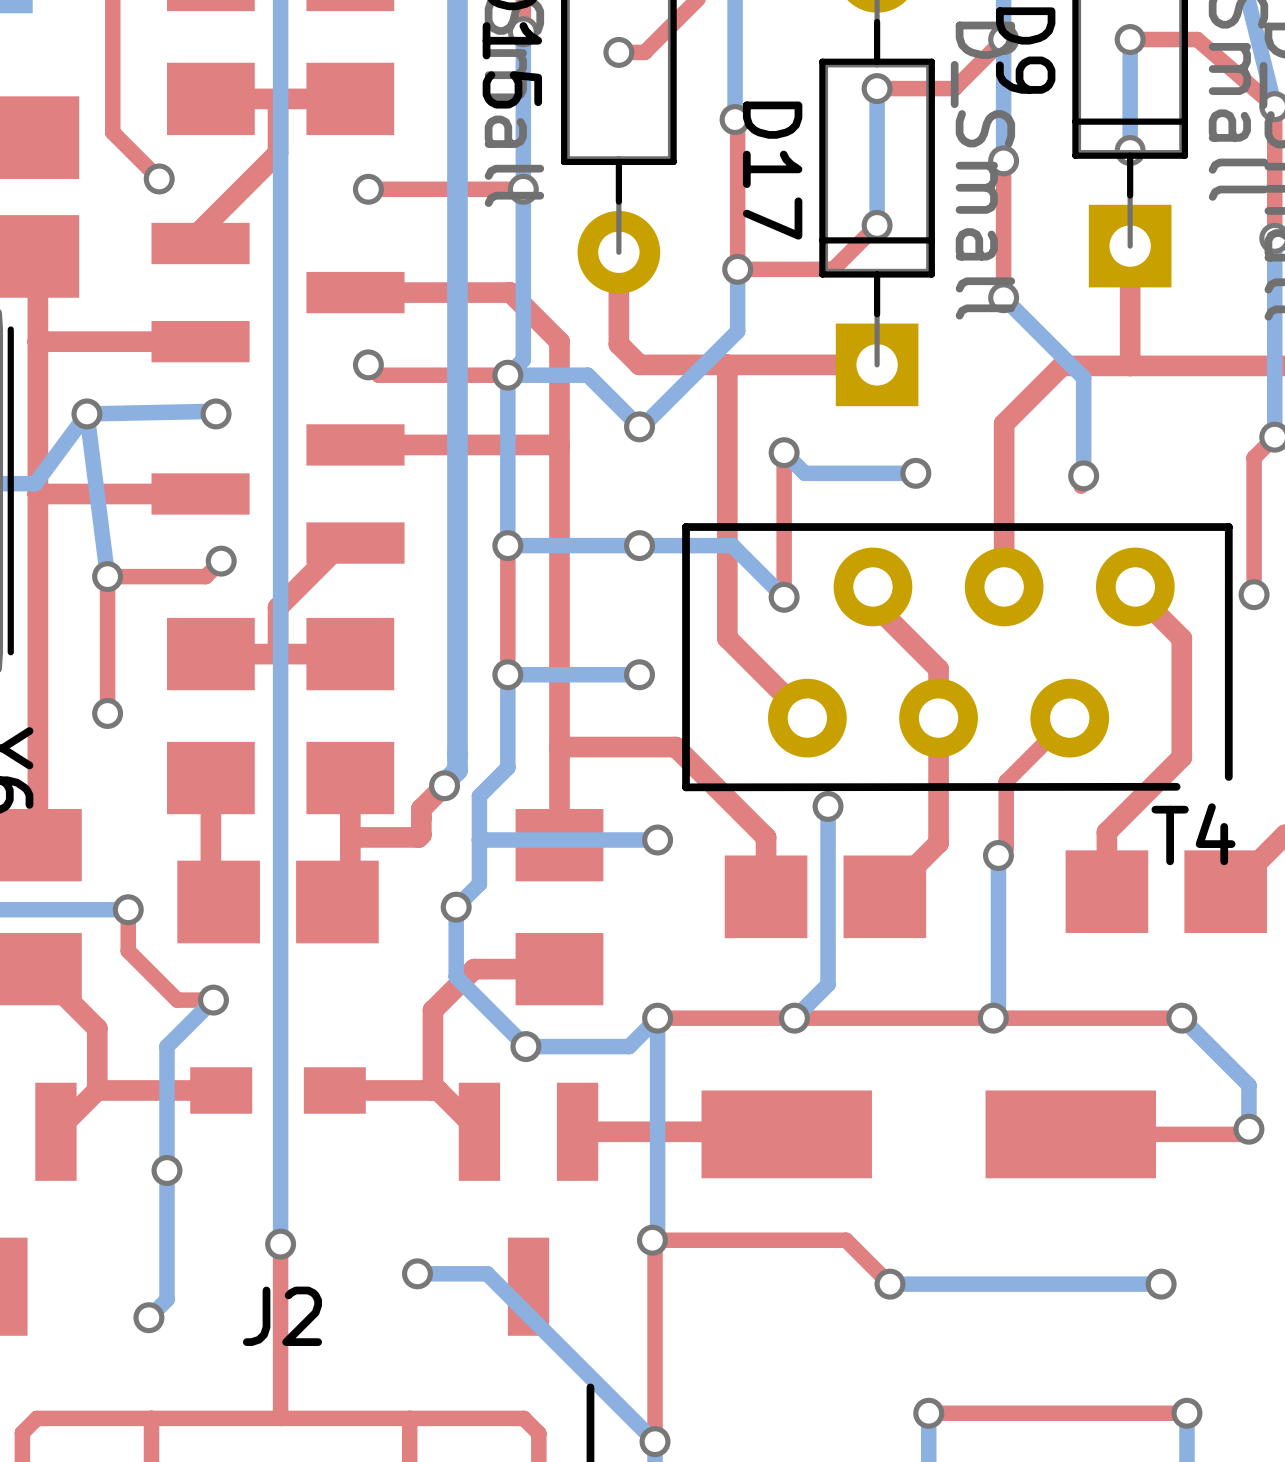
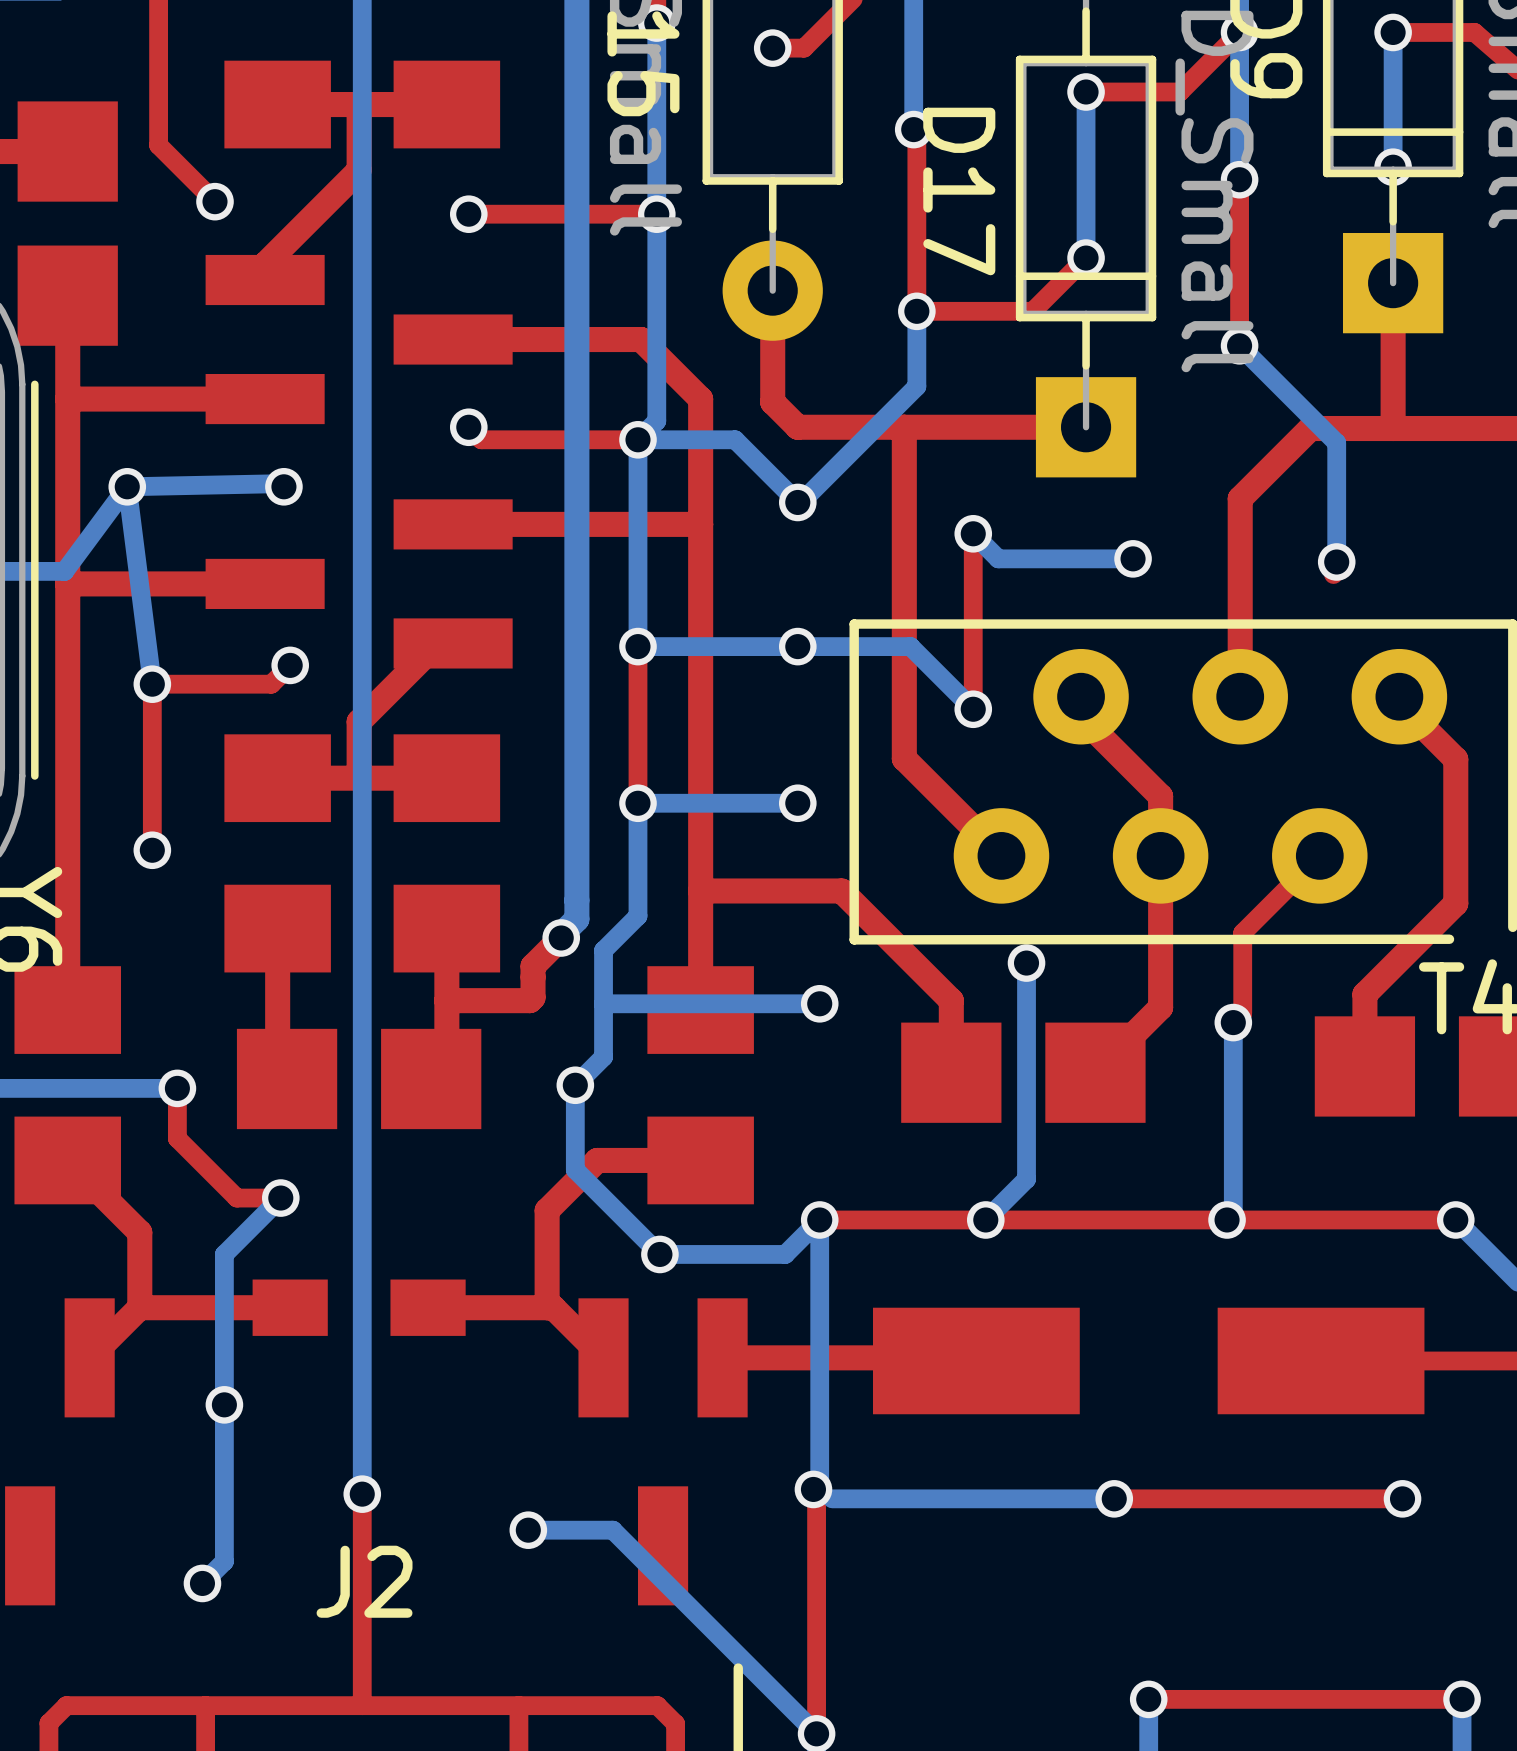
top track: (652, 1240) (846, 1240) (890, 1284) -> none
bottom track: none -> (1114, 1498) (832, 1498)
top track: none -> (1402, 1498) (1114, 1498)
via position: (890, 1284) -> (1114, 1498)
bottom track: (1161, 1284) (890, 1284) -> none
via position: (1161, 1284) -> (1402, 1498)

